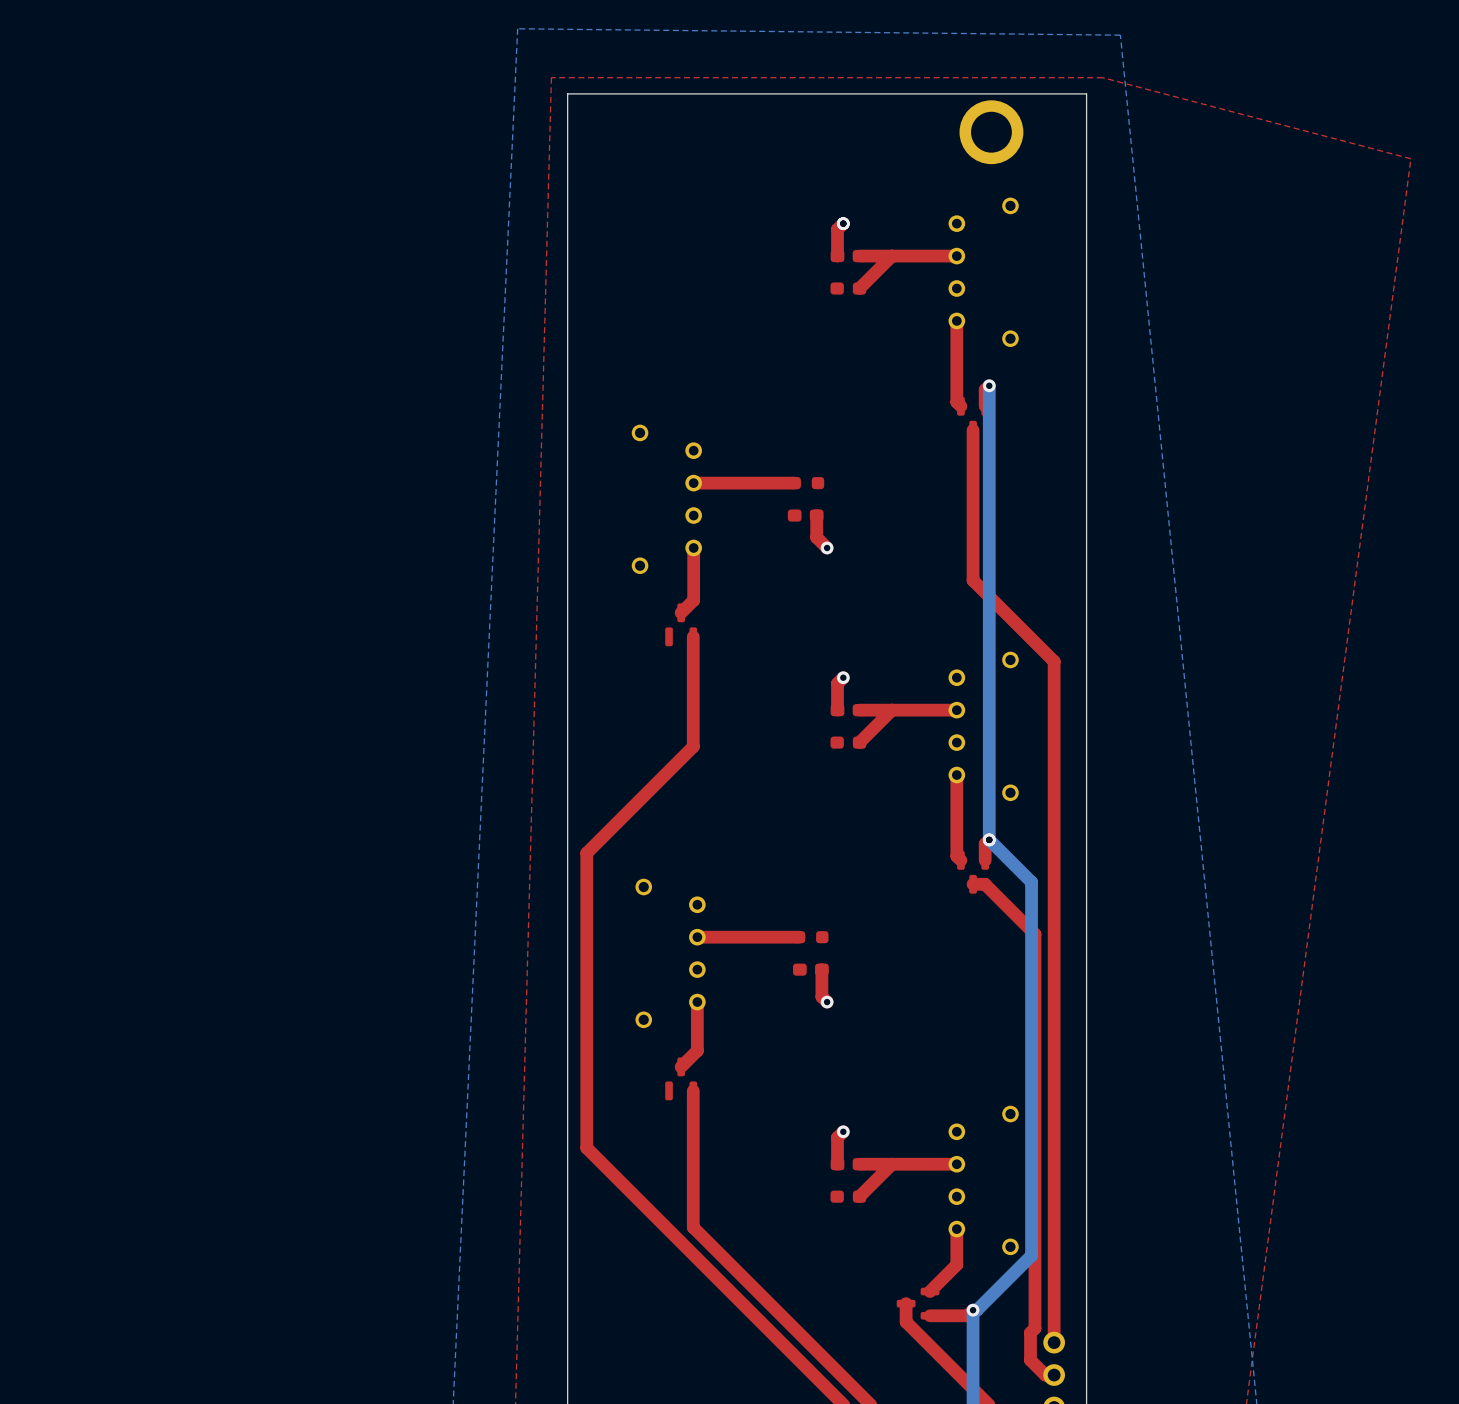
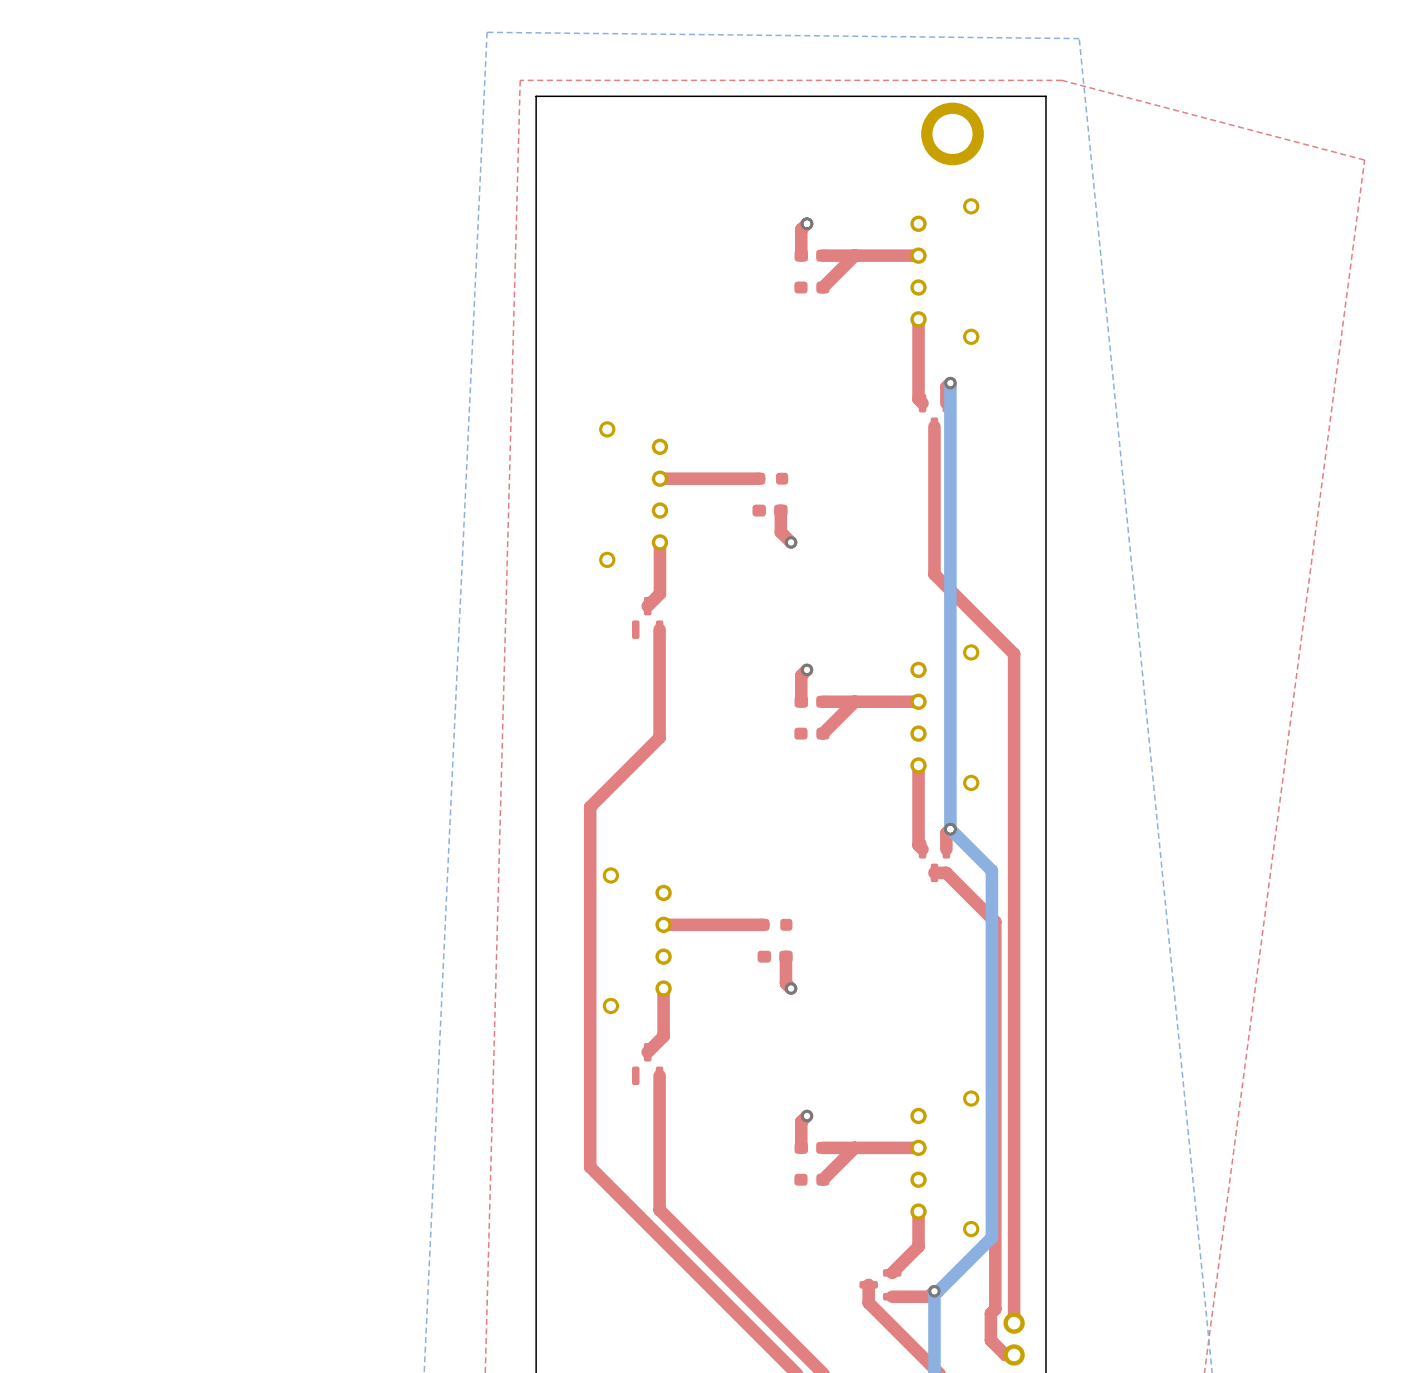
top track: (622, 817) (586, 853) (586, 1148) (622, 1183) -> (590, 807) (590, 1167)

